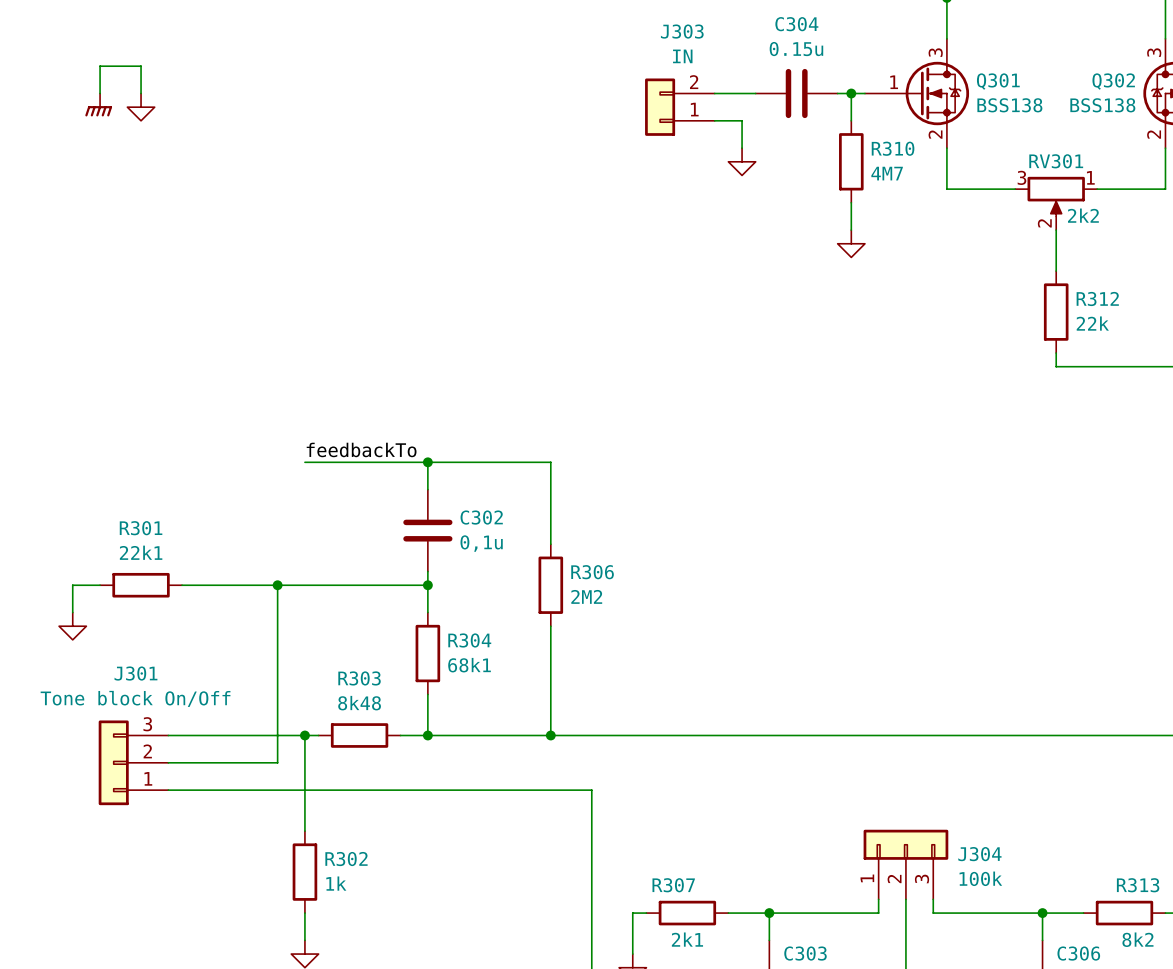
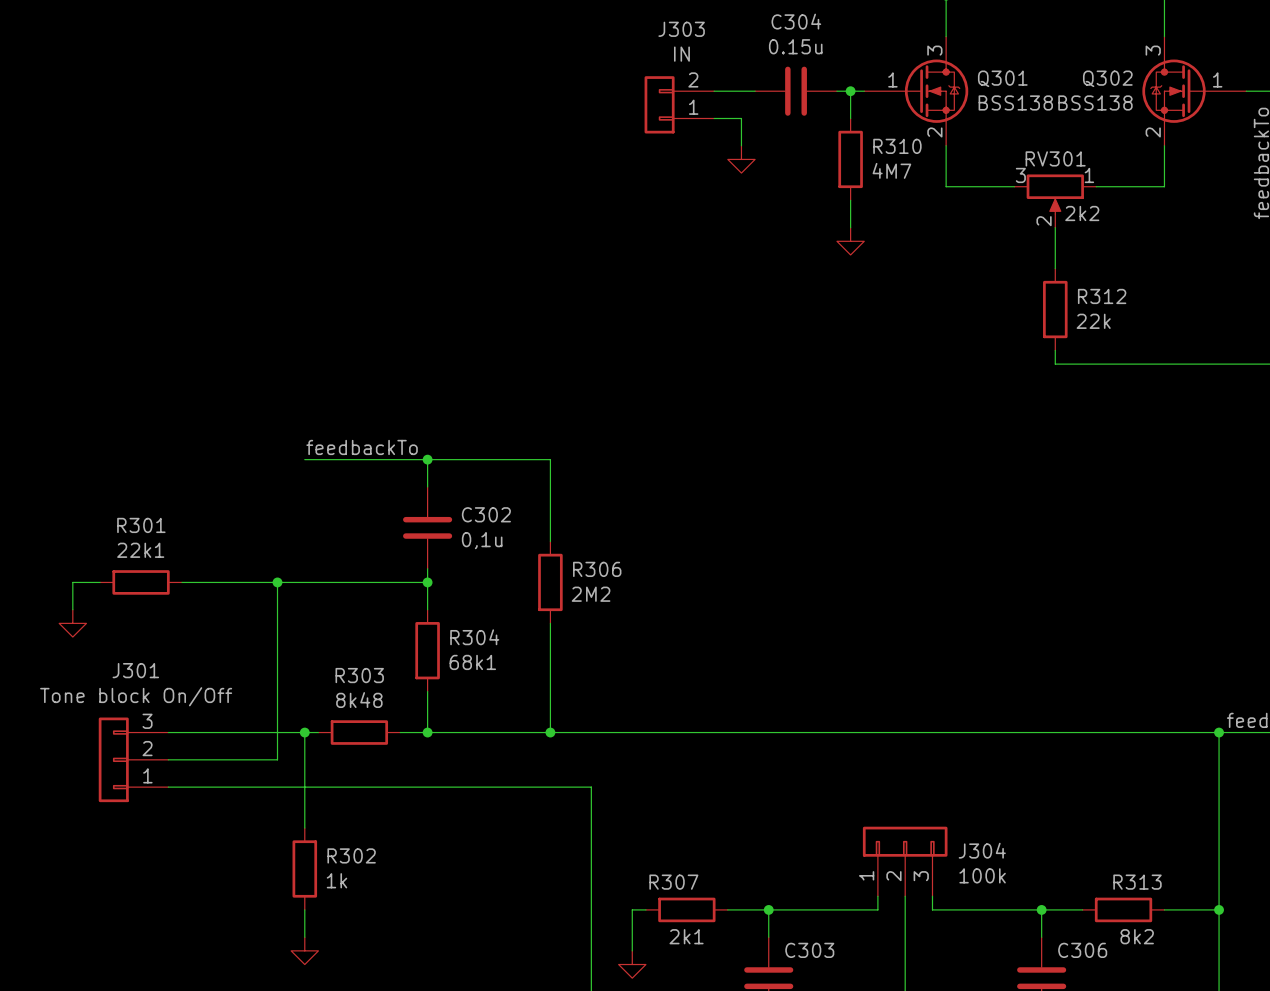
wire: (100, 93) (100, 66) (141, 66) (141, 93) -> none
power symbol: (98, 104) -> none
power symbol: (141, 107) -> none

